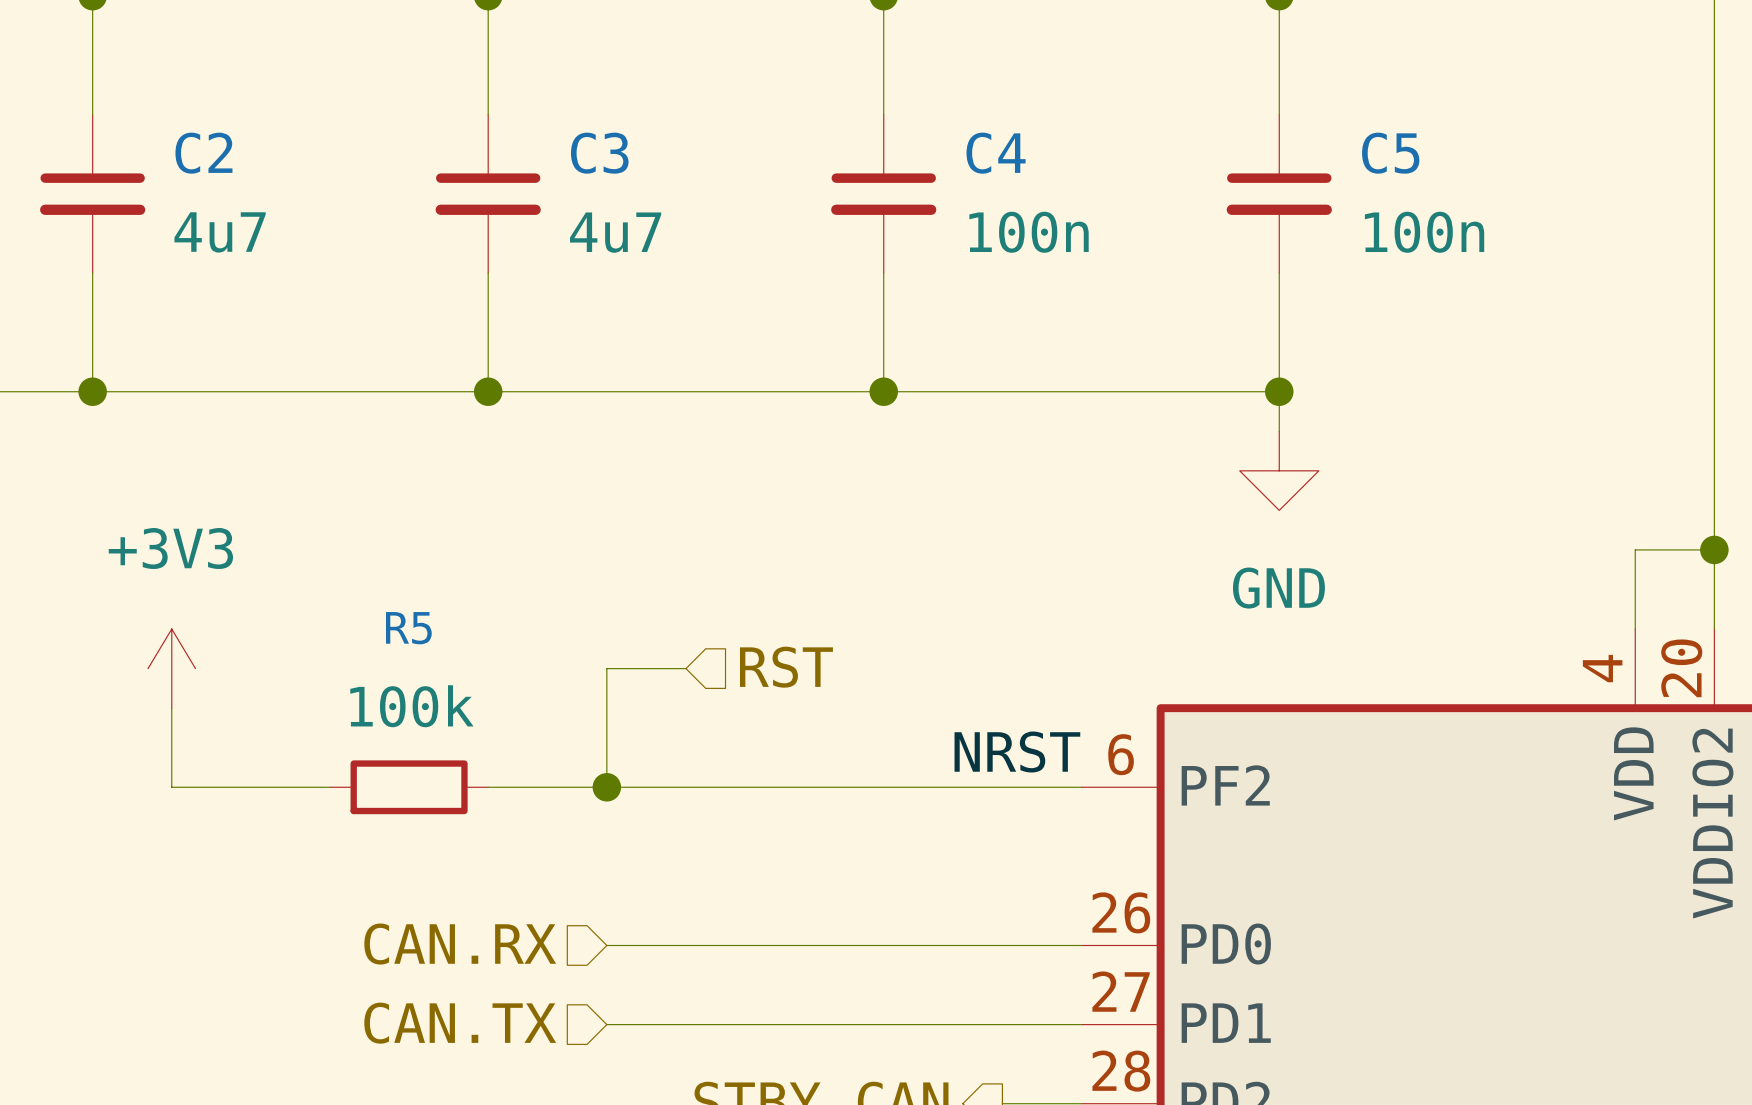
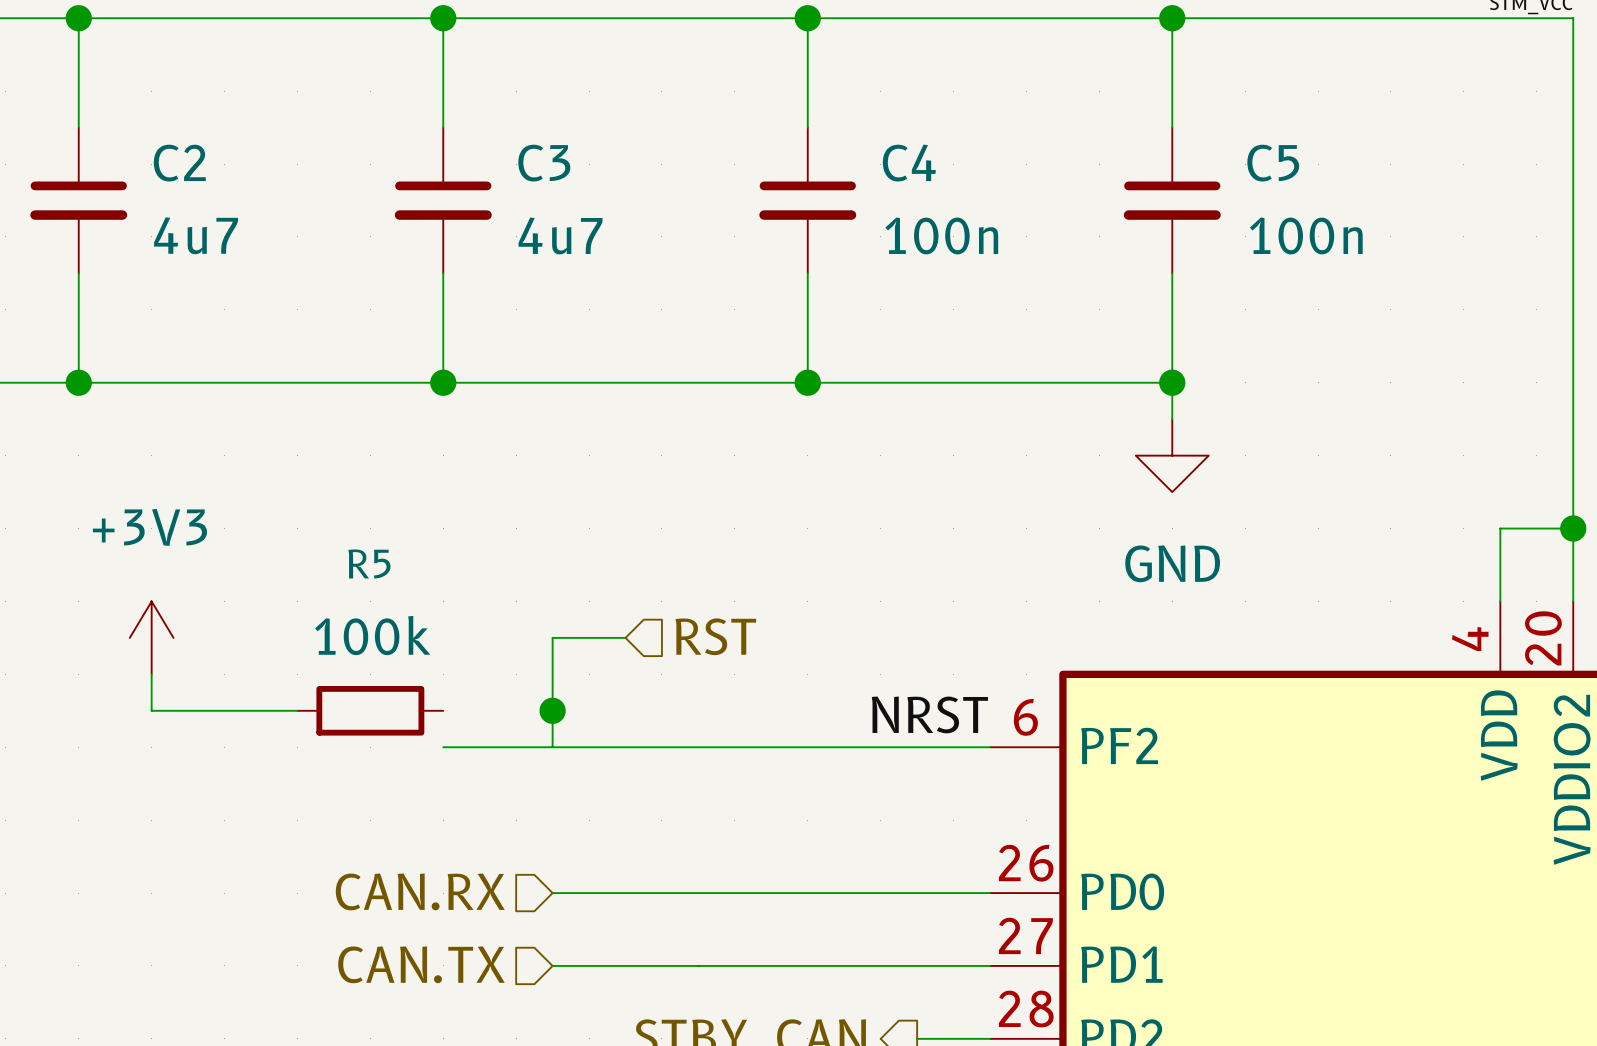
wire: (171, 747) (171, 787) (329, 787) -> (151, 710) (297, 710)
R5 position: (409, 787) -> (370, 710)
junction position: (606, 787) -> (552, 710)

